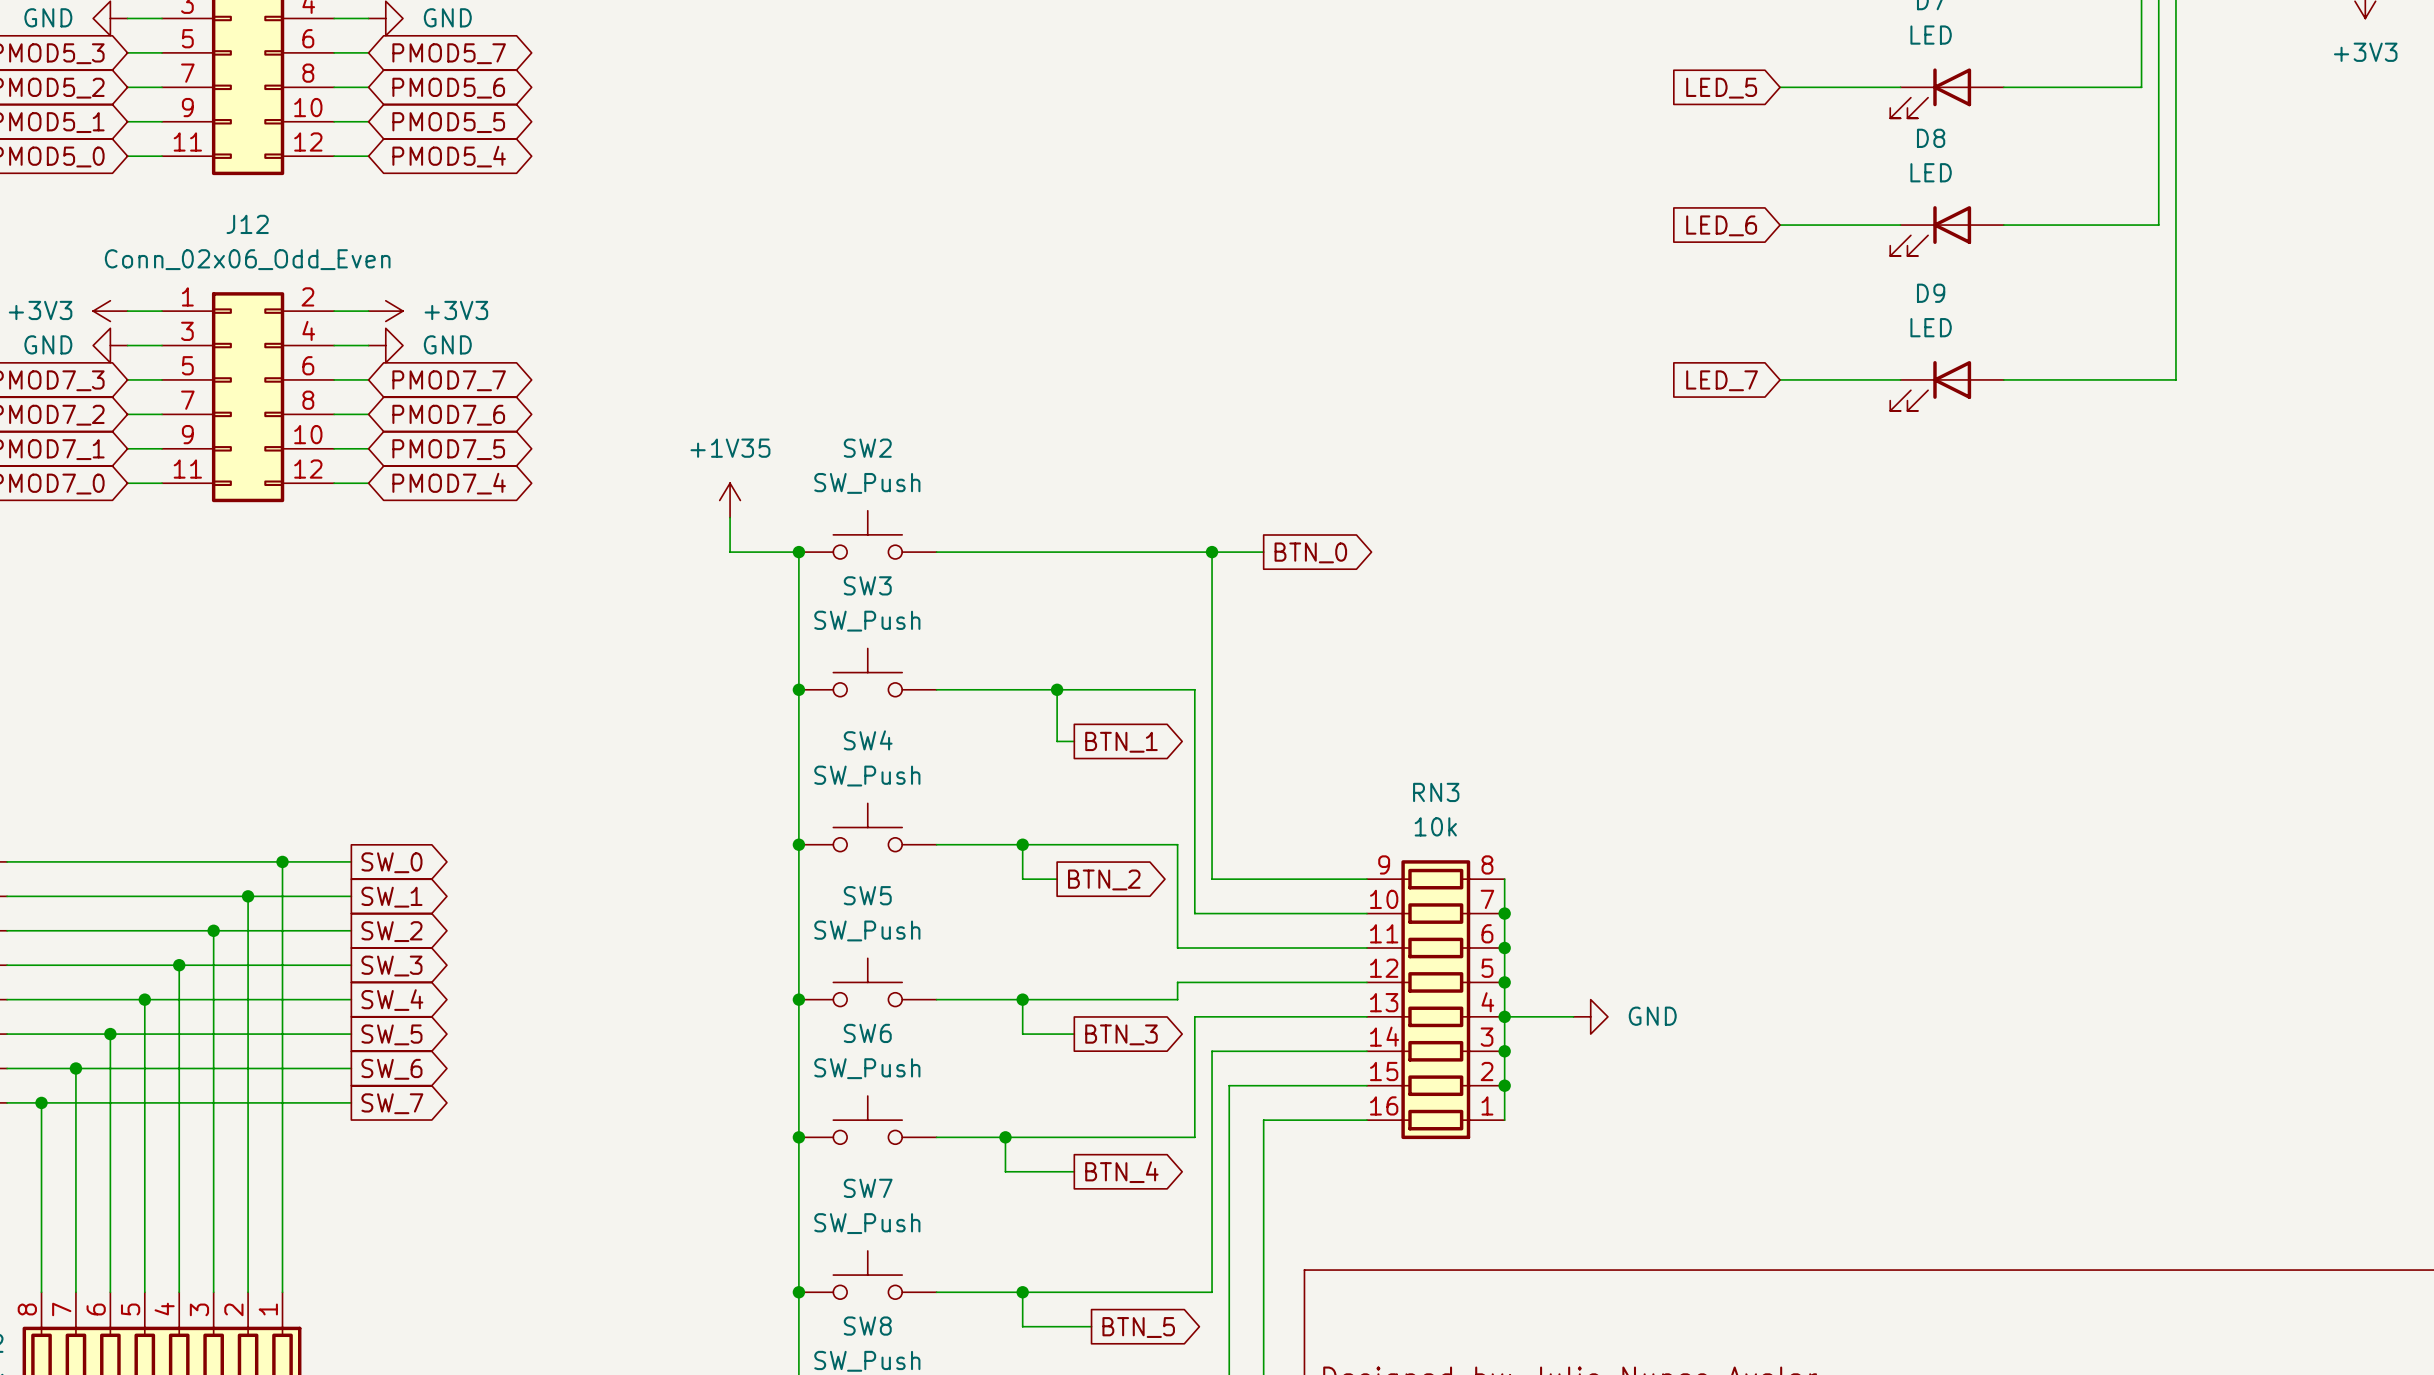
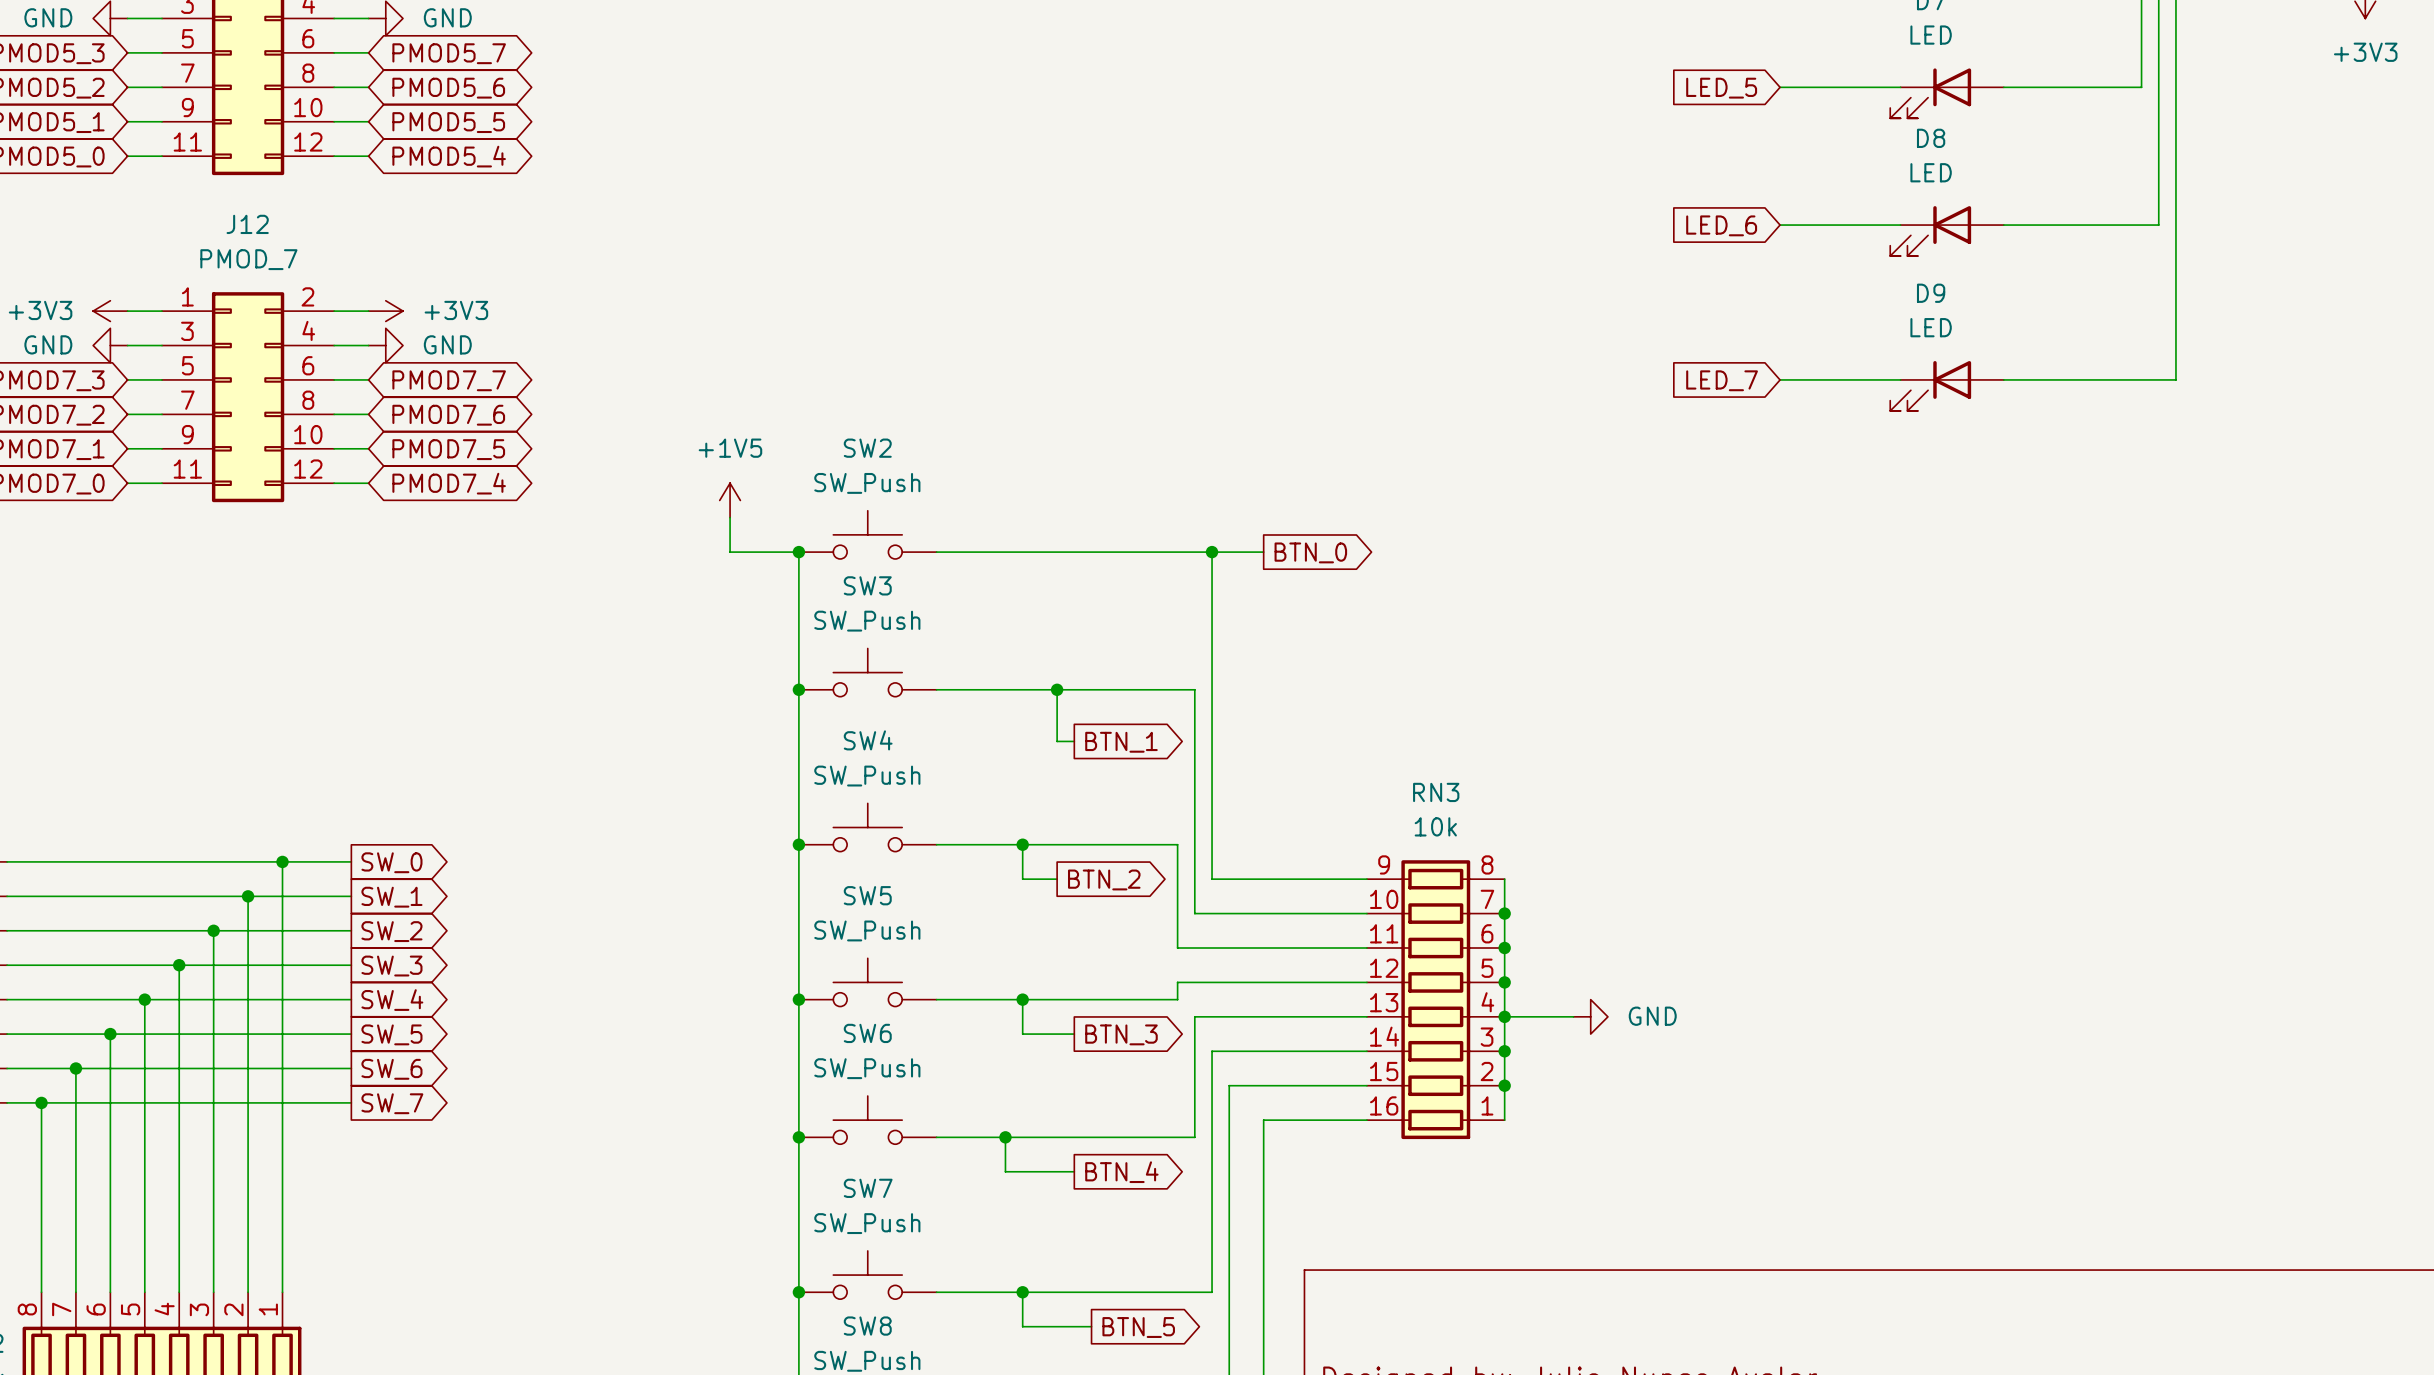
J12 value: Conn_02x06_Odd_Even (247, 259) -> PMOD_7 (248, 259)
power symbol: +1V35 (730, 500) -> +1V5 (730, 500)

